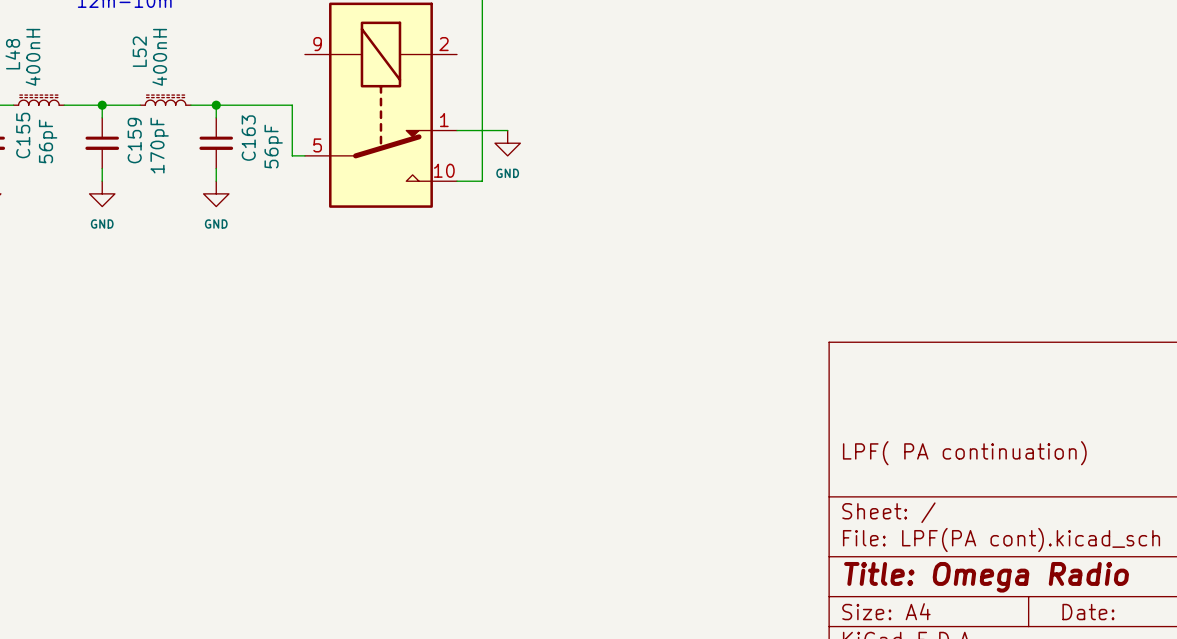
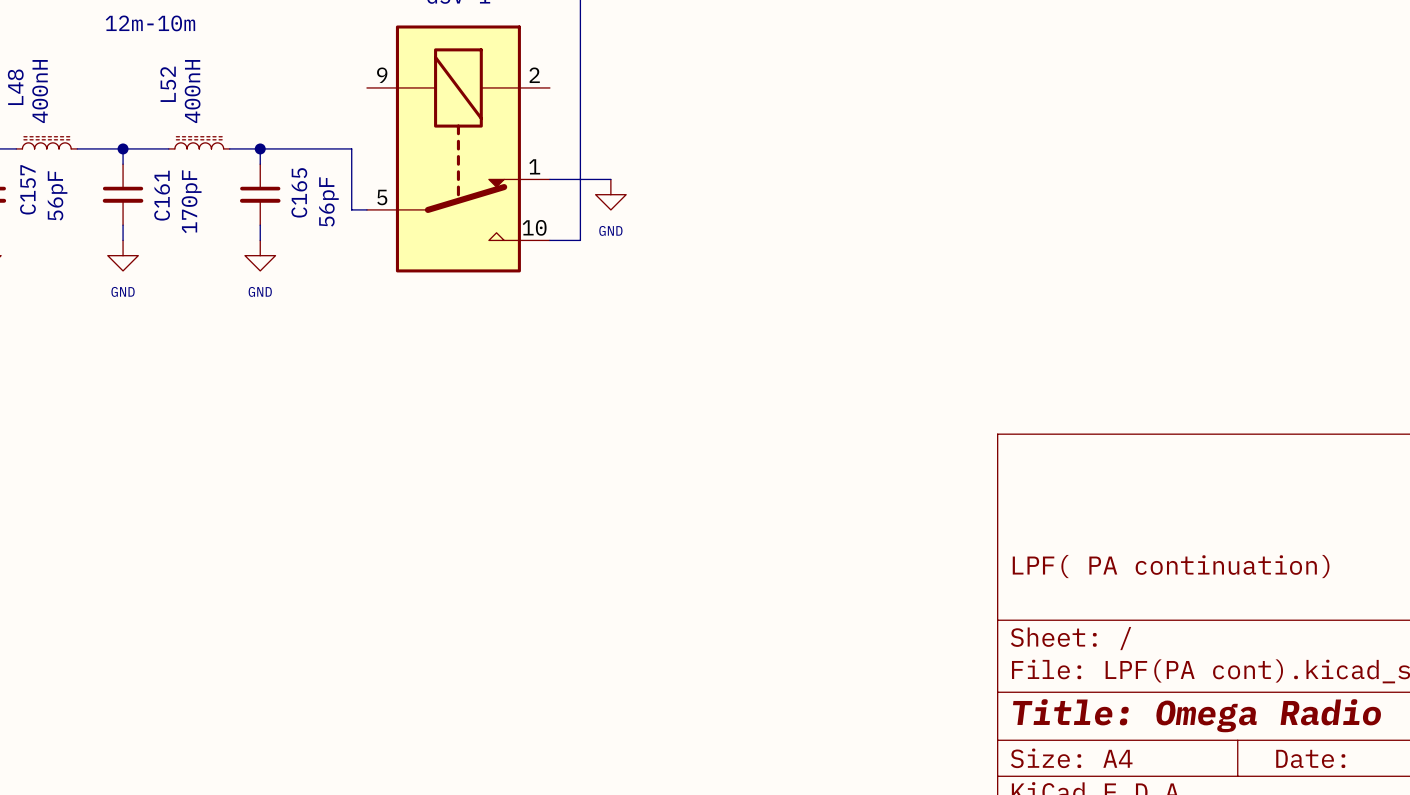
C155 name: C155 (23, 135) -> C157 (27, 189)
C163 name: C163 (248, 138) -> C165 (299, 192)
C159 name: C159 (134, 140) -> C161 (162, 195)

